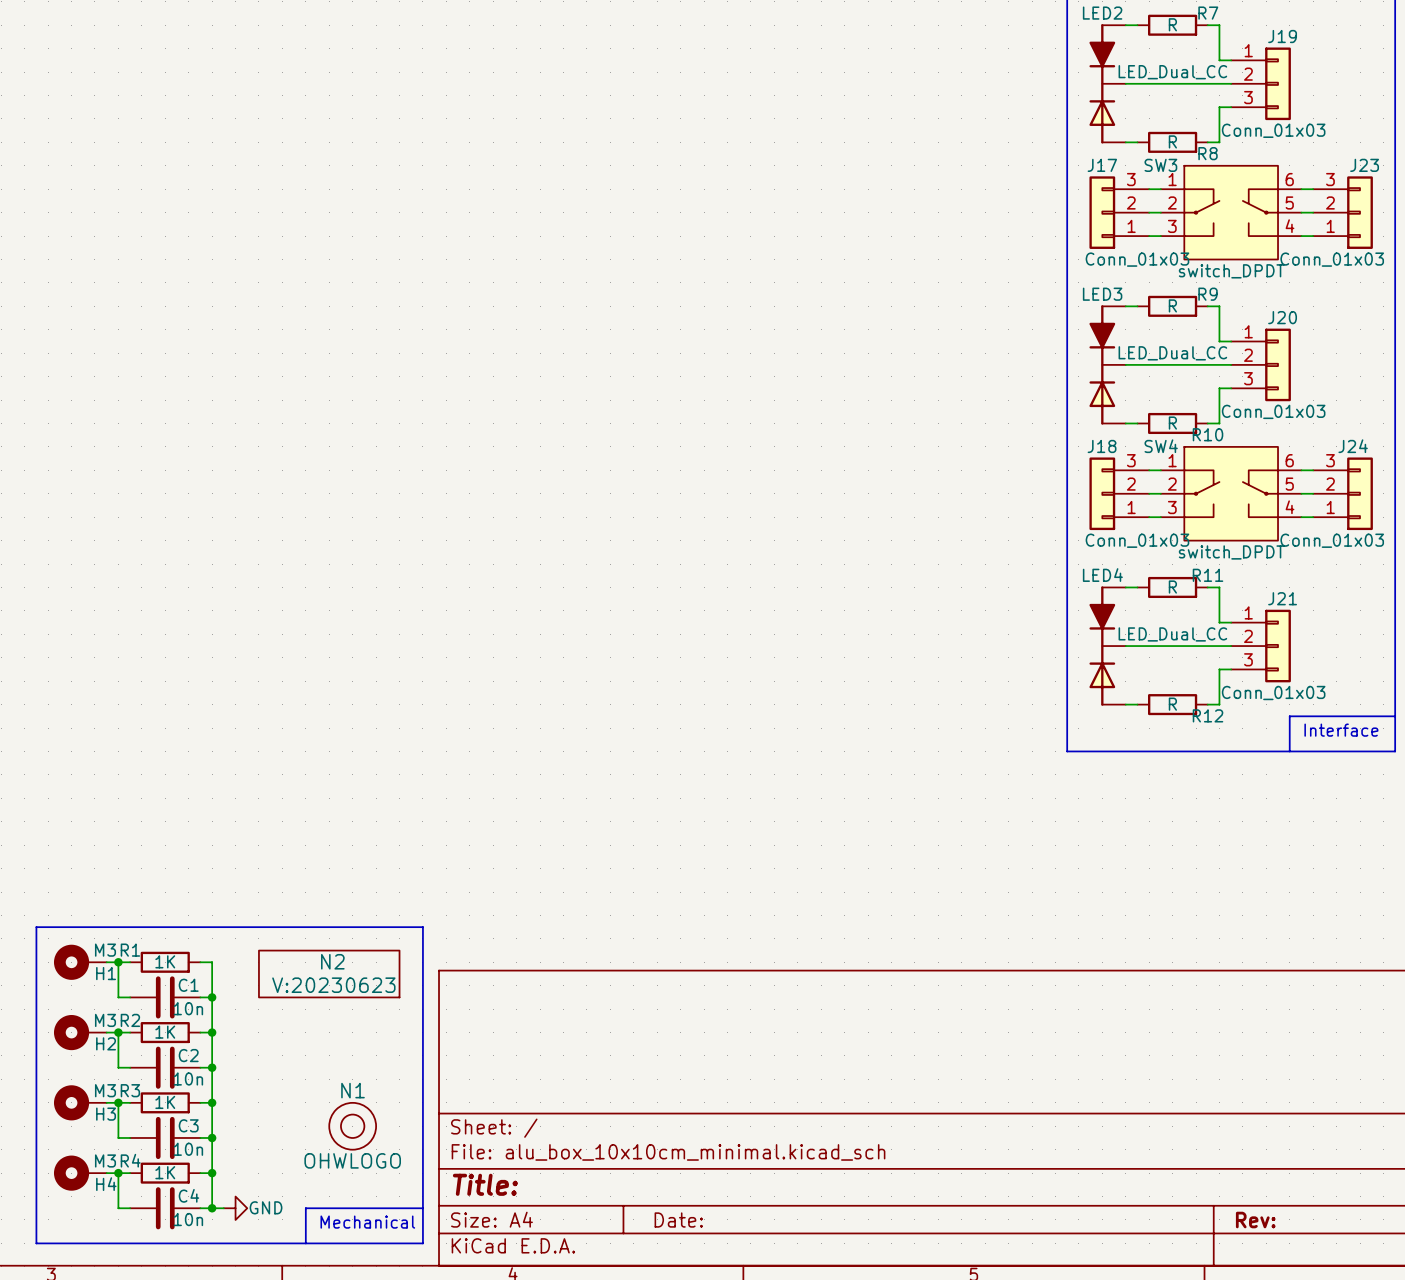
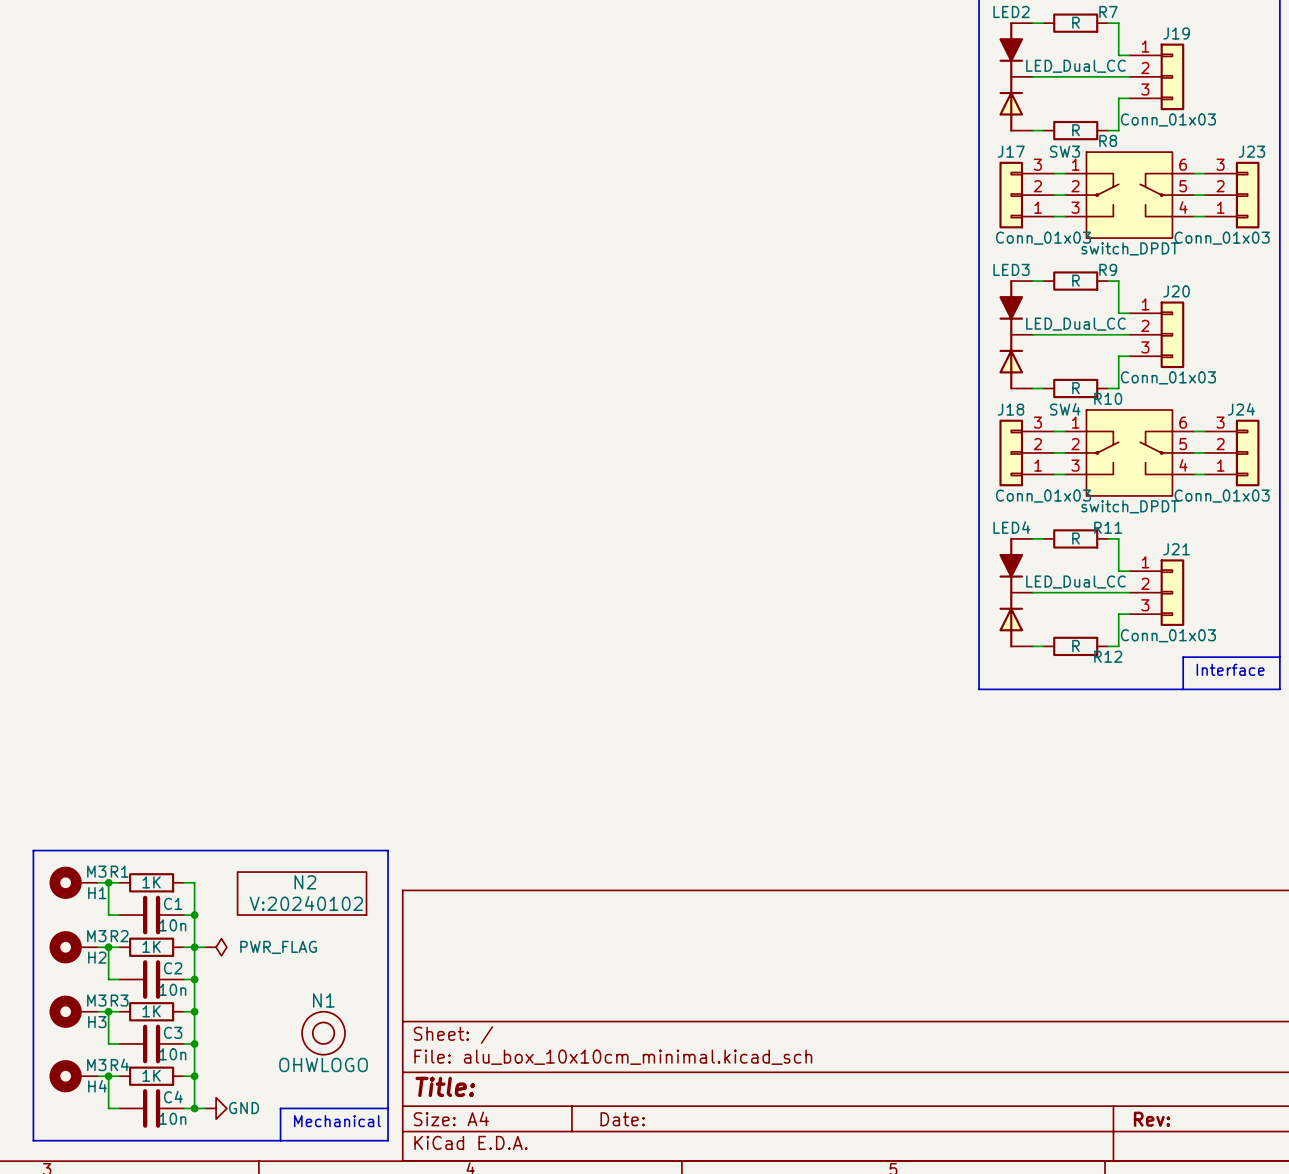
N2 value: V:20230623 (333, 985) -> V:20240102 (306, 903)
wire: none -> (194, 947) (205, 947)
power symbol: none -> PWR_FLAG (216, 947)

